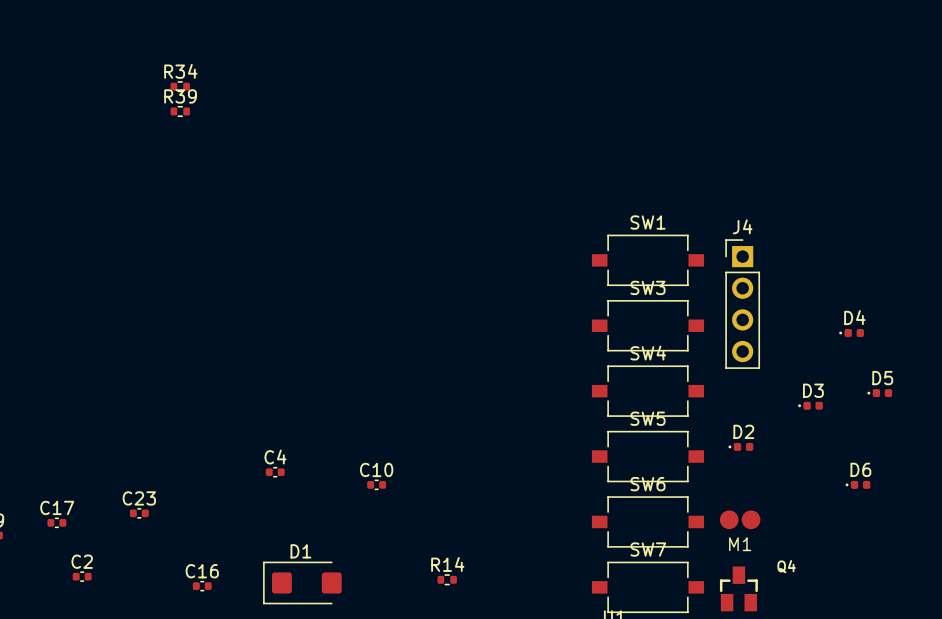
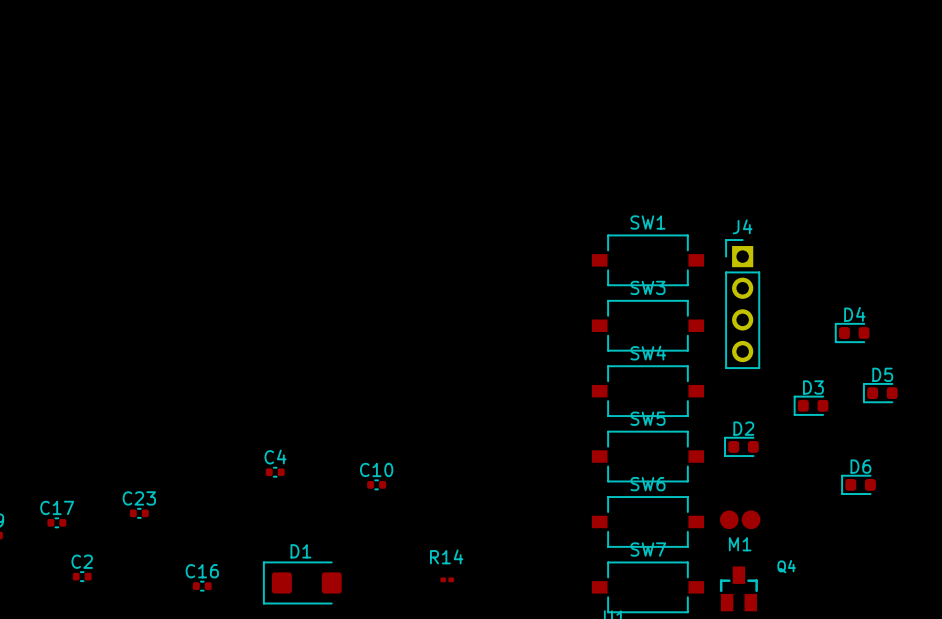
R34: (180, 86) -> none
R39: (180, 111) -> none
D4 footprint: [839, 329, 864, 337] -> [835, 323, 870, 343]
D5 footprint: [867, 389, 893, 398] -> [863, 383, 898, 404]
D3 footprint: [798, 401, 823, 410] -> [793, 395, 829, 416]
D2 footprint: [728, 442, 754, 451] -> [724, 437, 759, 457]
D6 footprint: [845, 480, 871, 489] -> [841, 474, 876, 495]
R14 footprint: [437, 574, 457, 586] -> [440, 577, 455, 583]

